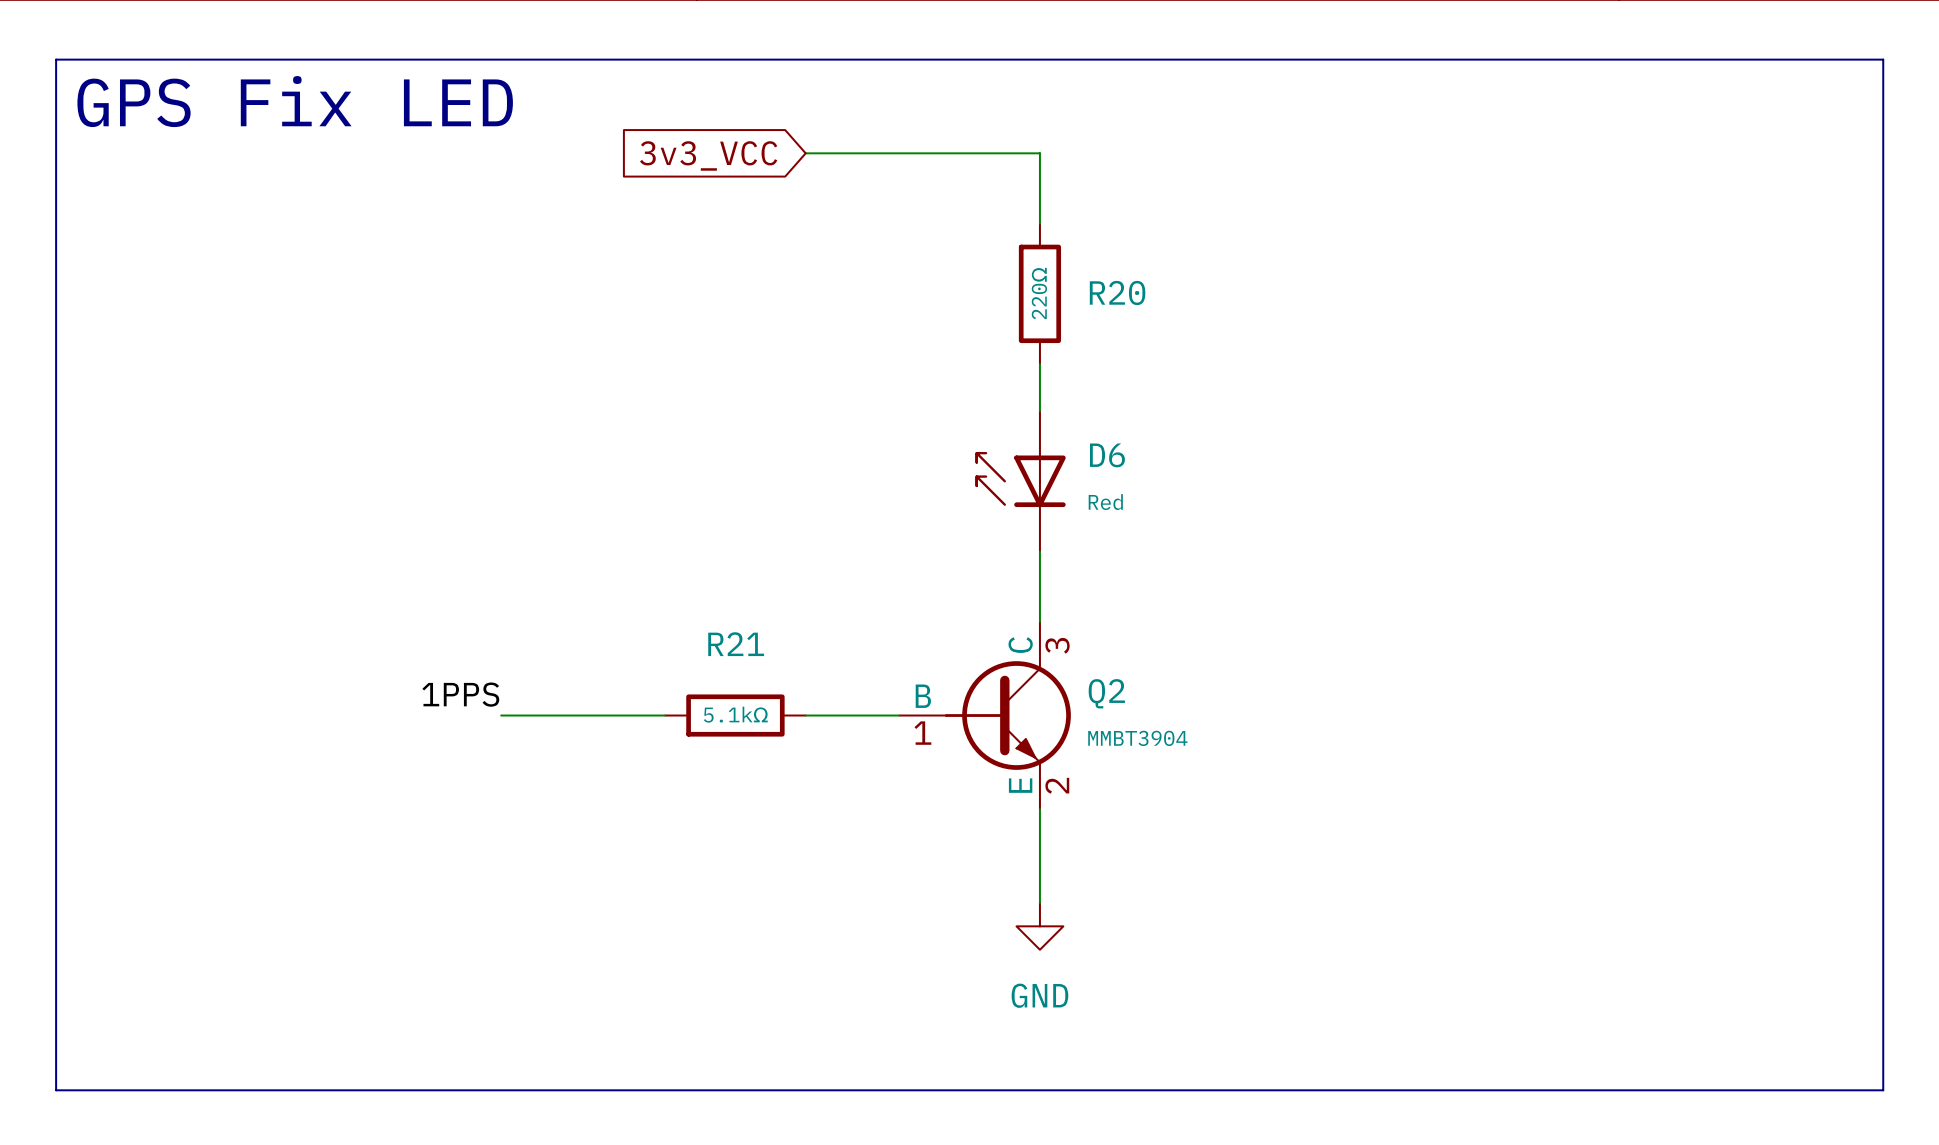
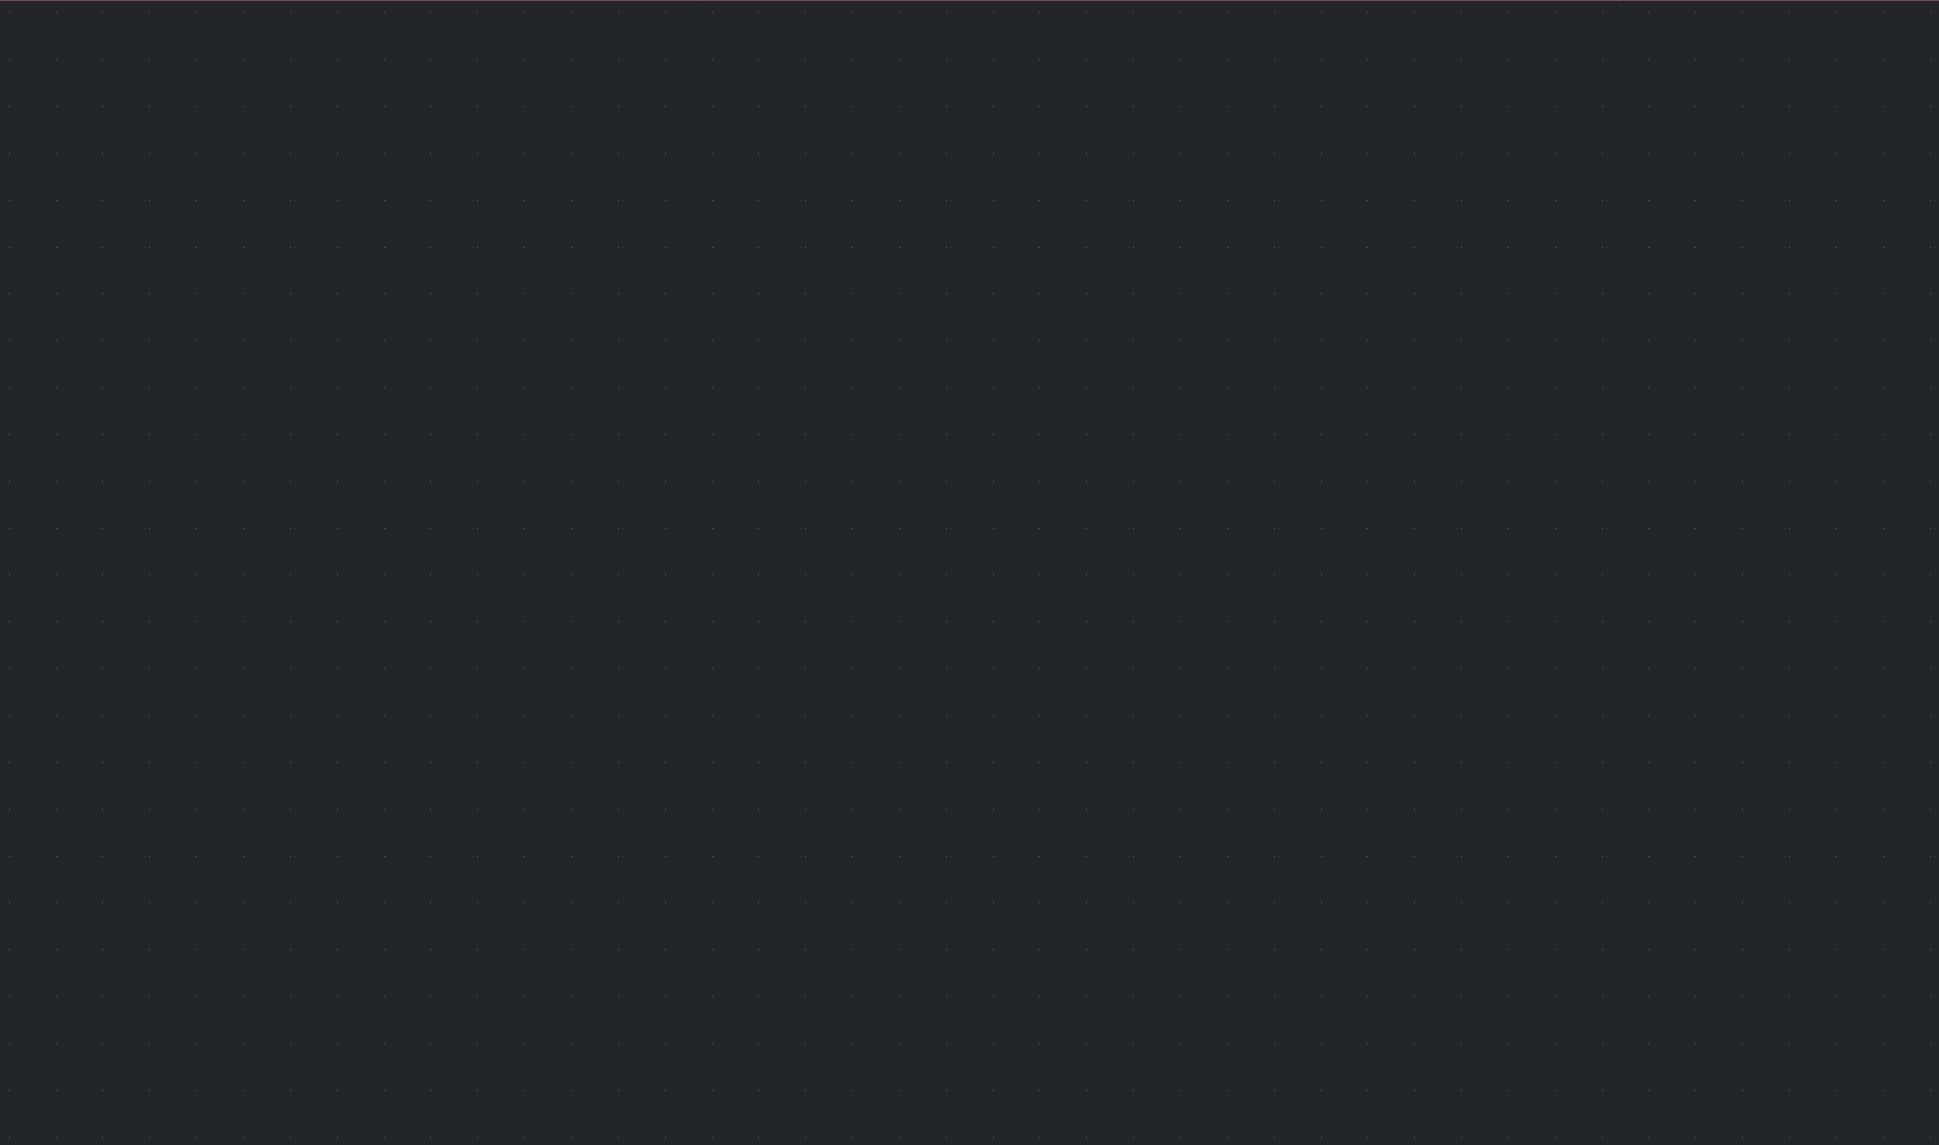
line: (56, 59) (1883, 59) (1883, 1090) (56, 1090) (56, 59) -> none
text: GPS Fix LED (295, 101) -> none
wire: (805, 153) (1039, 153) (1039, 223) -> none
global label: 3v3_VCC (708, 155) -> none
R20: 220Ω (1039, 293) -> none
wire: (1039, 364) (1039, 410) -> none
D6: Red (1020, 481) -> none
wire: (1039, 551) (1039, 621) -> none
label: 1PPS (460, 694) -> none
wire: (501, 715) (665, 715) -> none
R21: 5.1kΩ (735, 715) -> none
wire: (805, 715) (899, 715) -> none
Q2: MMBT3904 (985, 715) -> none
wire: (1039, 809) (1039, 902) -> none
power symbol: GND (1039, 926) -> none

